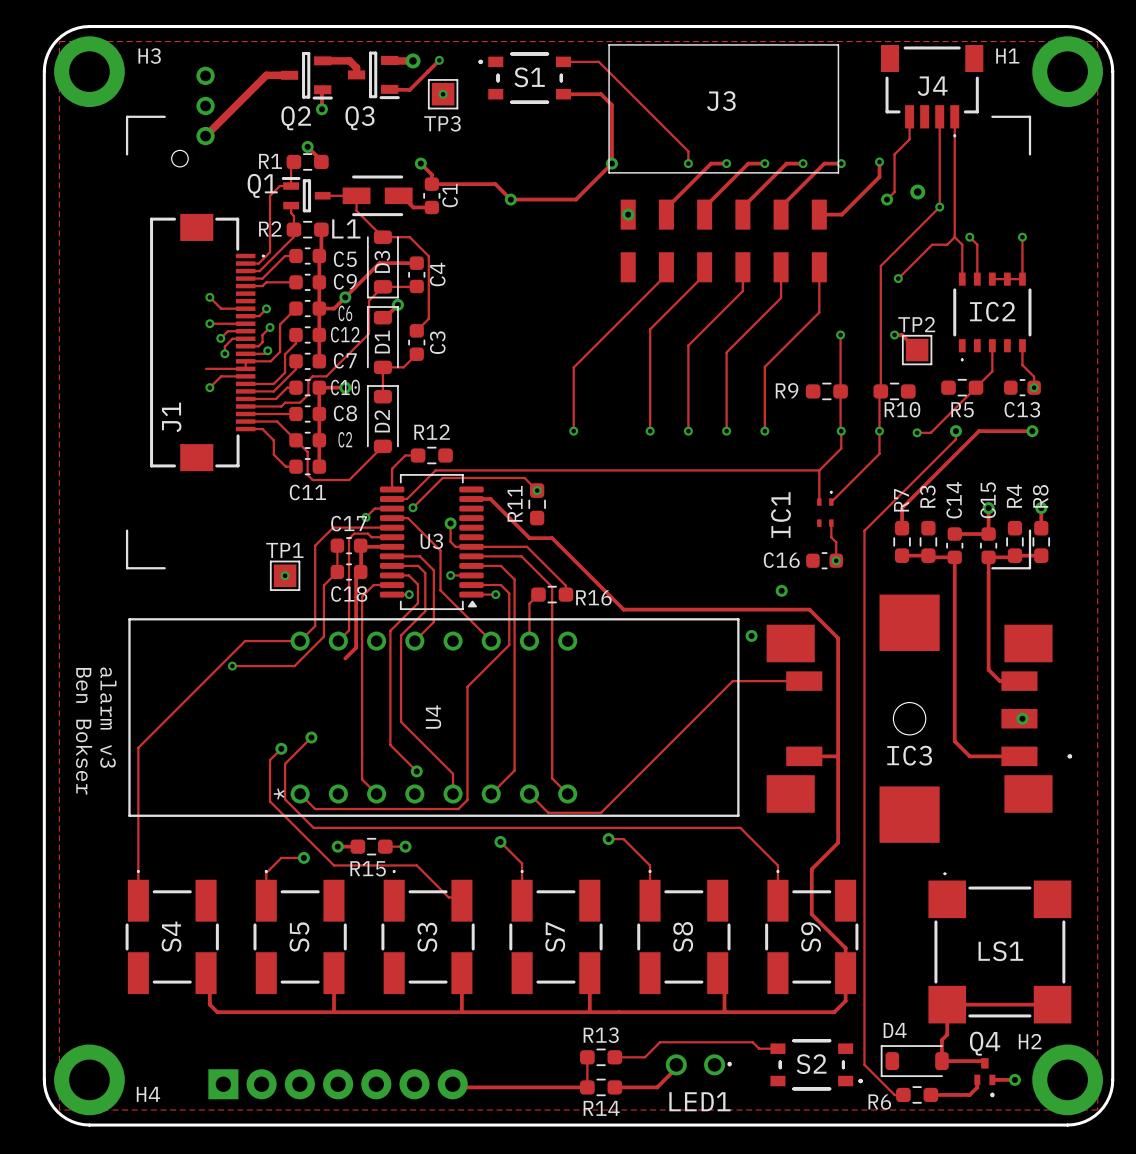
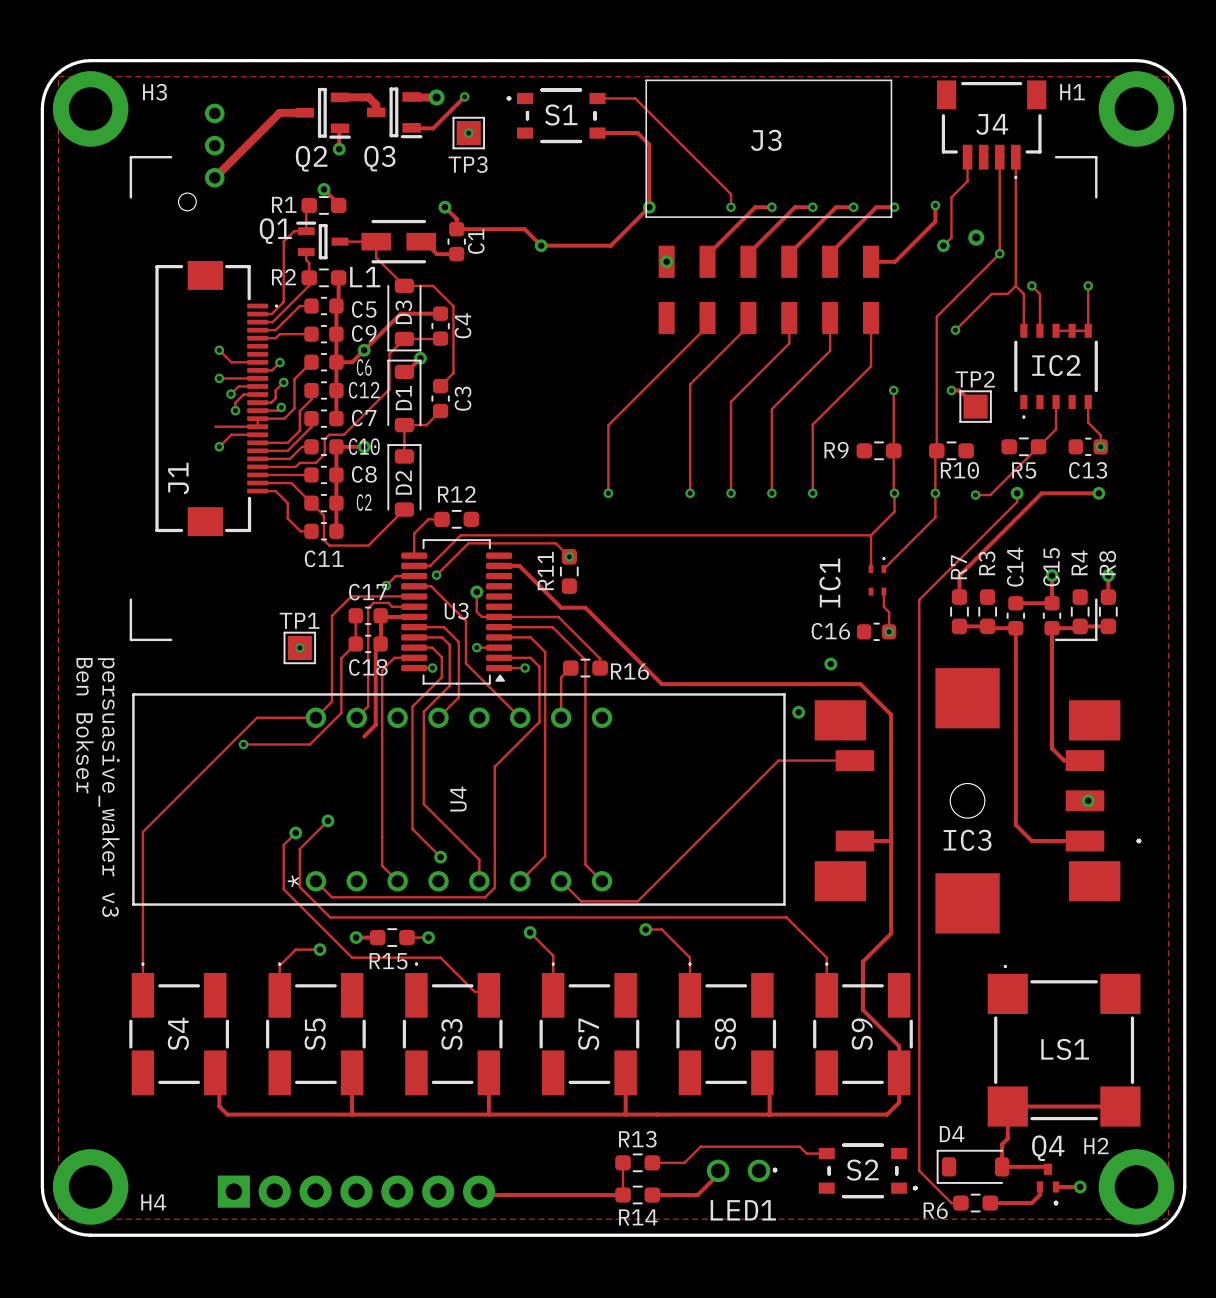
text: none -> persuasive_waker v3 (108, 787)
text: alarm v3 (108, 717) -> none
text position: Ben Bokser (84, 731) -> Ben Bokser (84, 725)

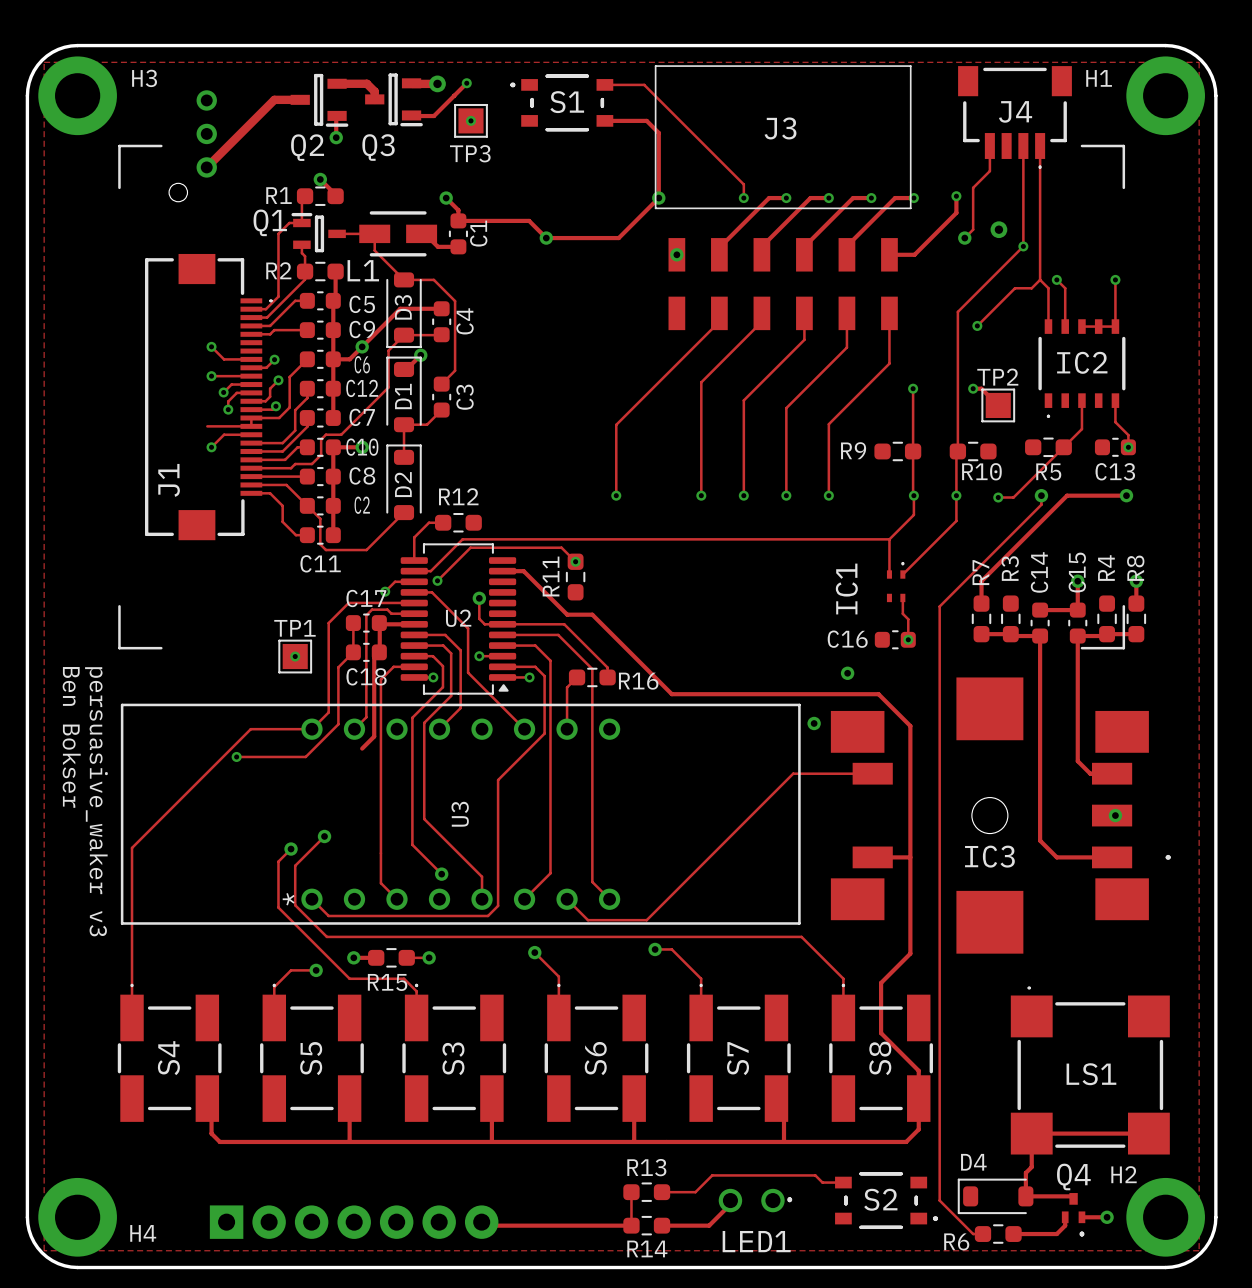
U3 name: U3 (456, 611) -> U2 (458, 618)
U4 name: U4 (458, 799) -> U3 (460, 814)
track: (404, 957) (440, 957) (474, 991) (492, 991) -> (404, 978) (416, 991) (416, 1017)
S7 name: S7 (588, 1034) -> S6 (595, 1058)
S8 name: S8 (725, 1034) -> S7 (738, 1058)
S9 name: S9 (862, 1034) -> S8 (880, 1058)

